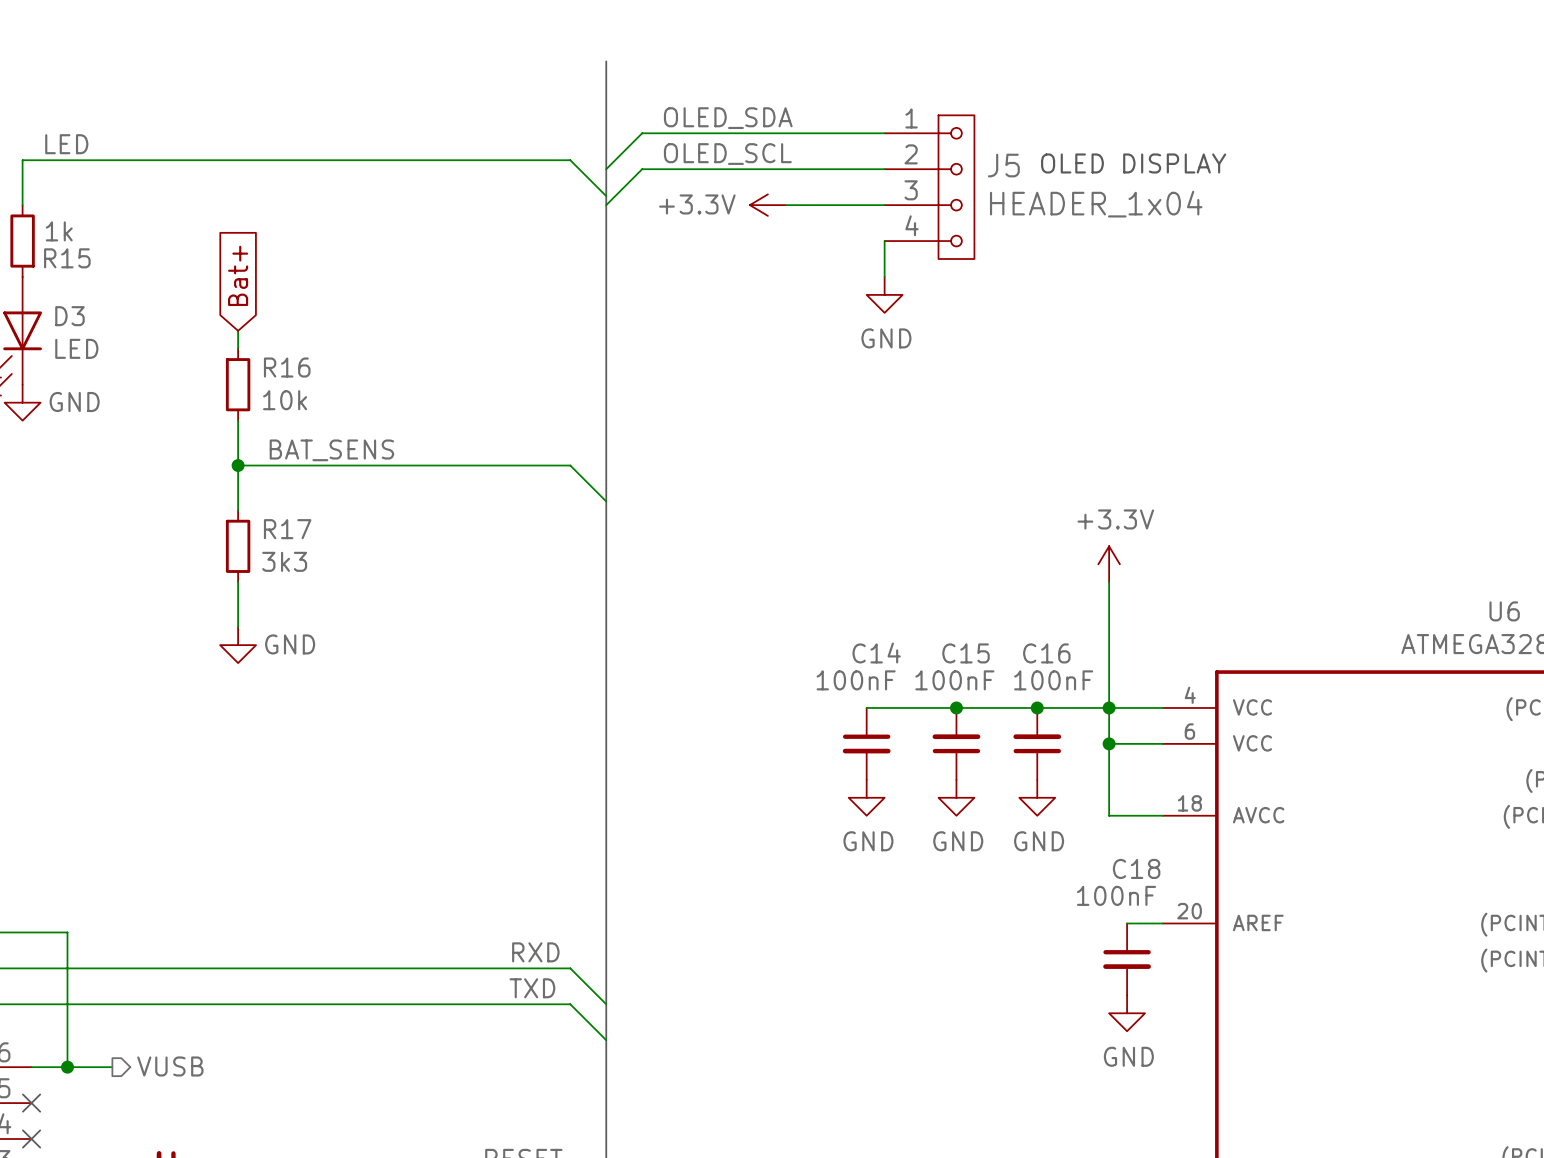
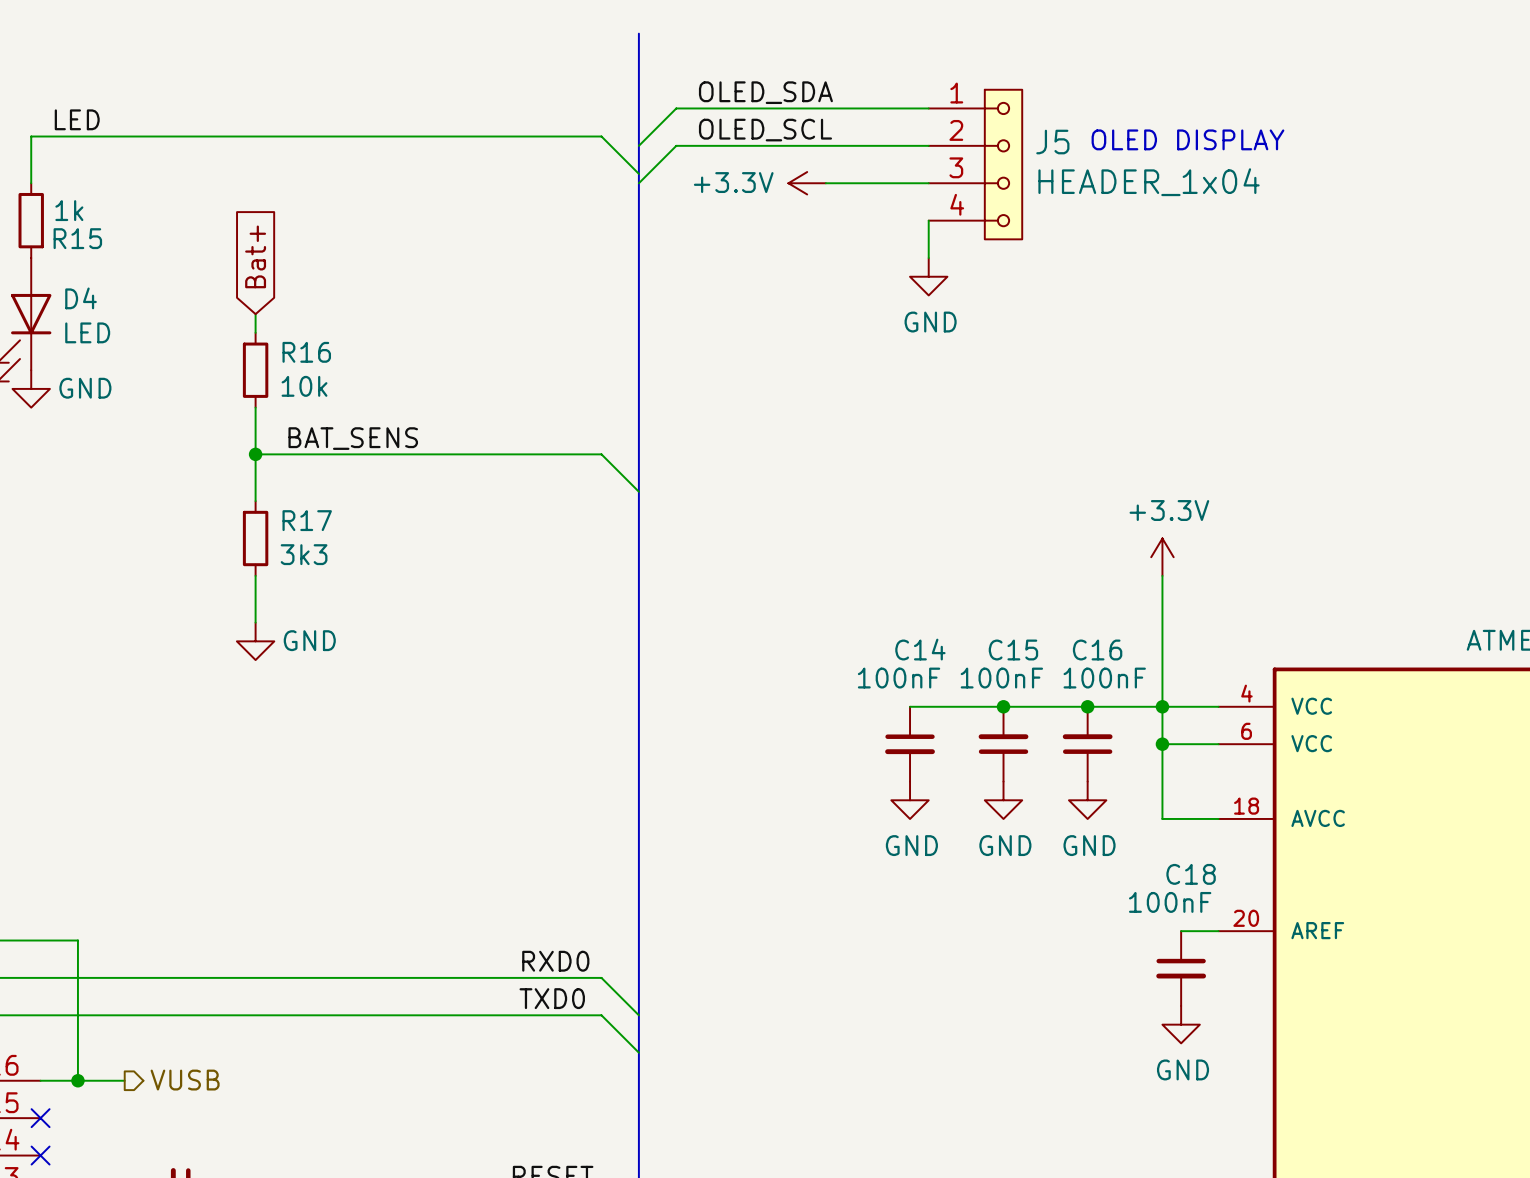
D3 name: D3 (69, 316) -> D4 (81, 298)
label: RXD (535, 952) -> RXD0 (555, 961)
label: TXD (532, 988) -> TXD0 (552, 998)

